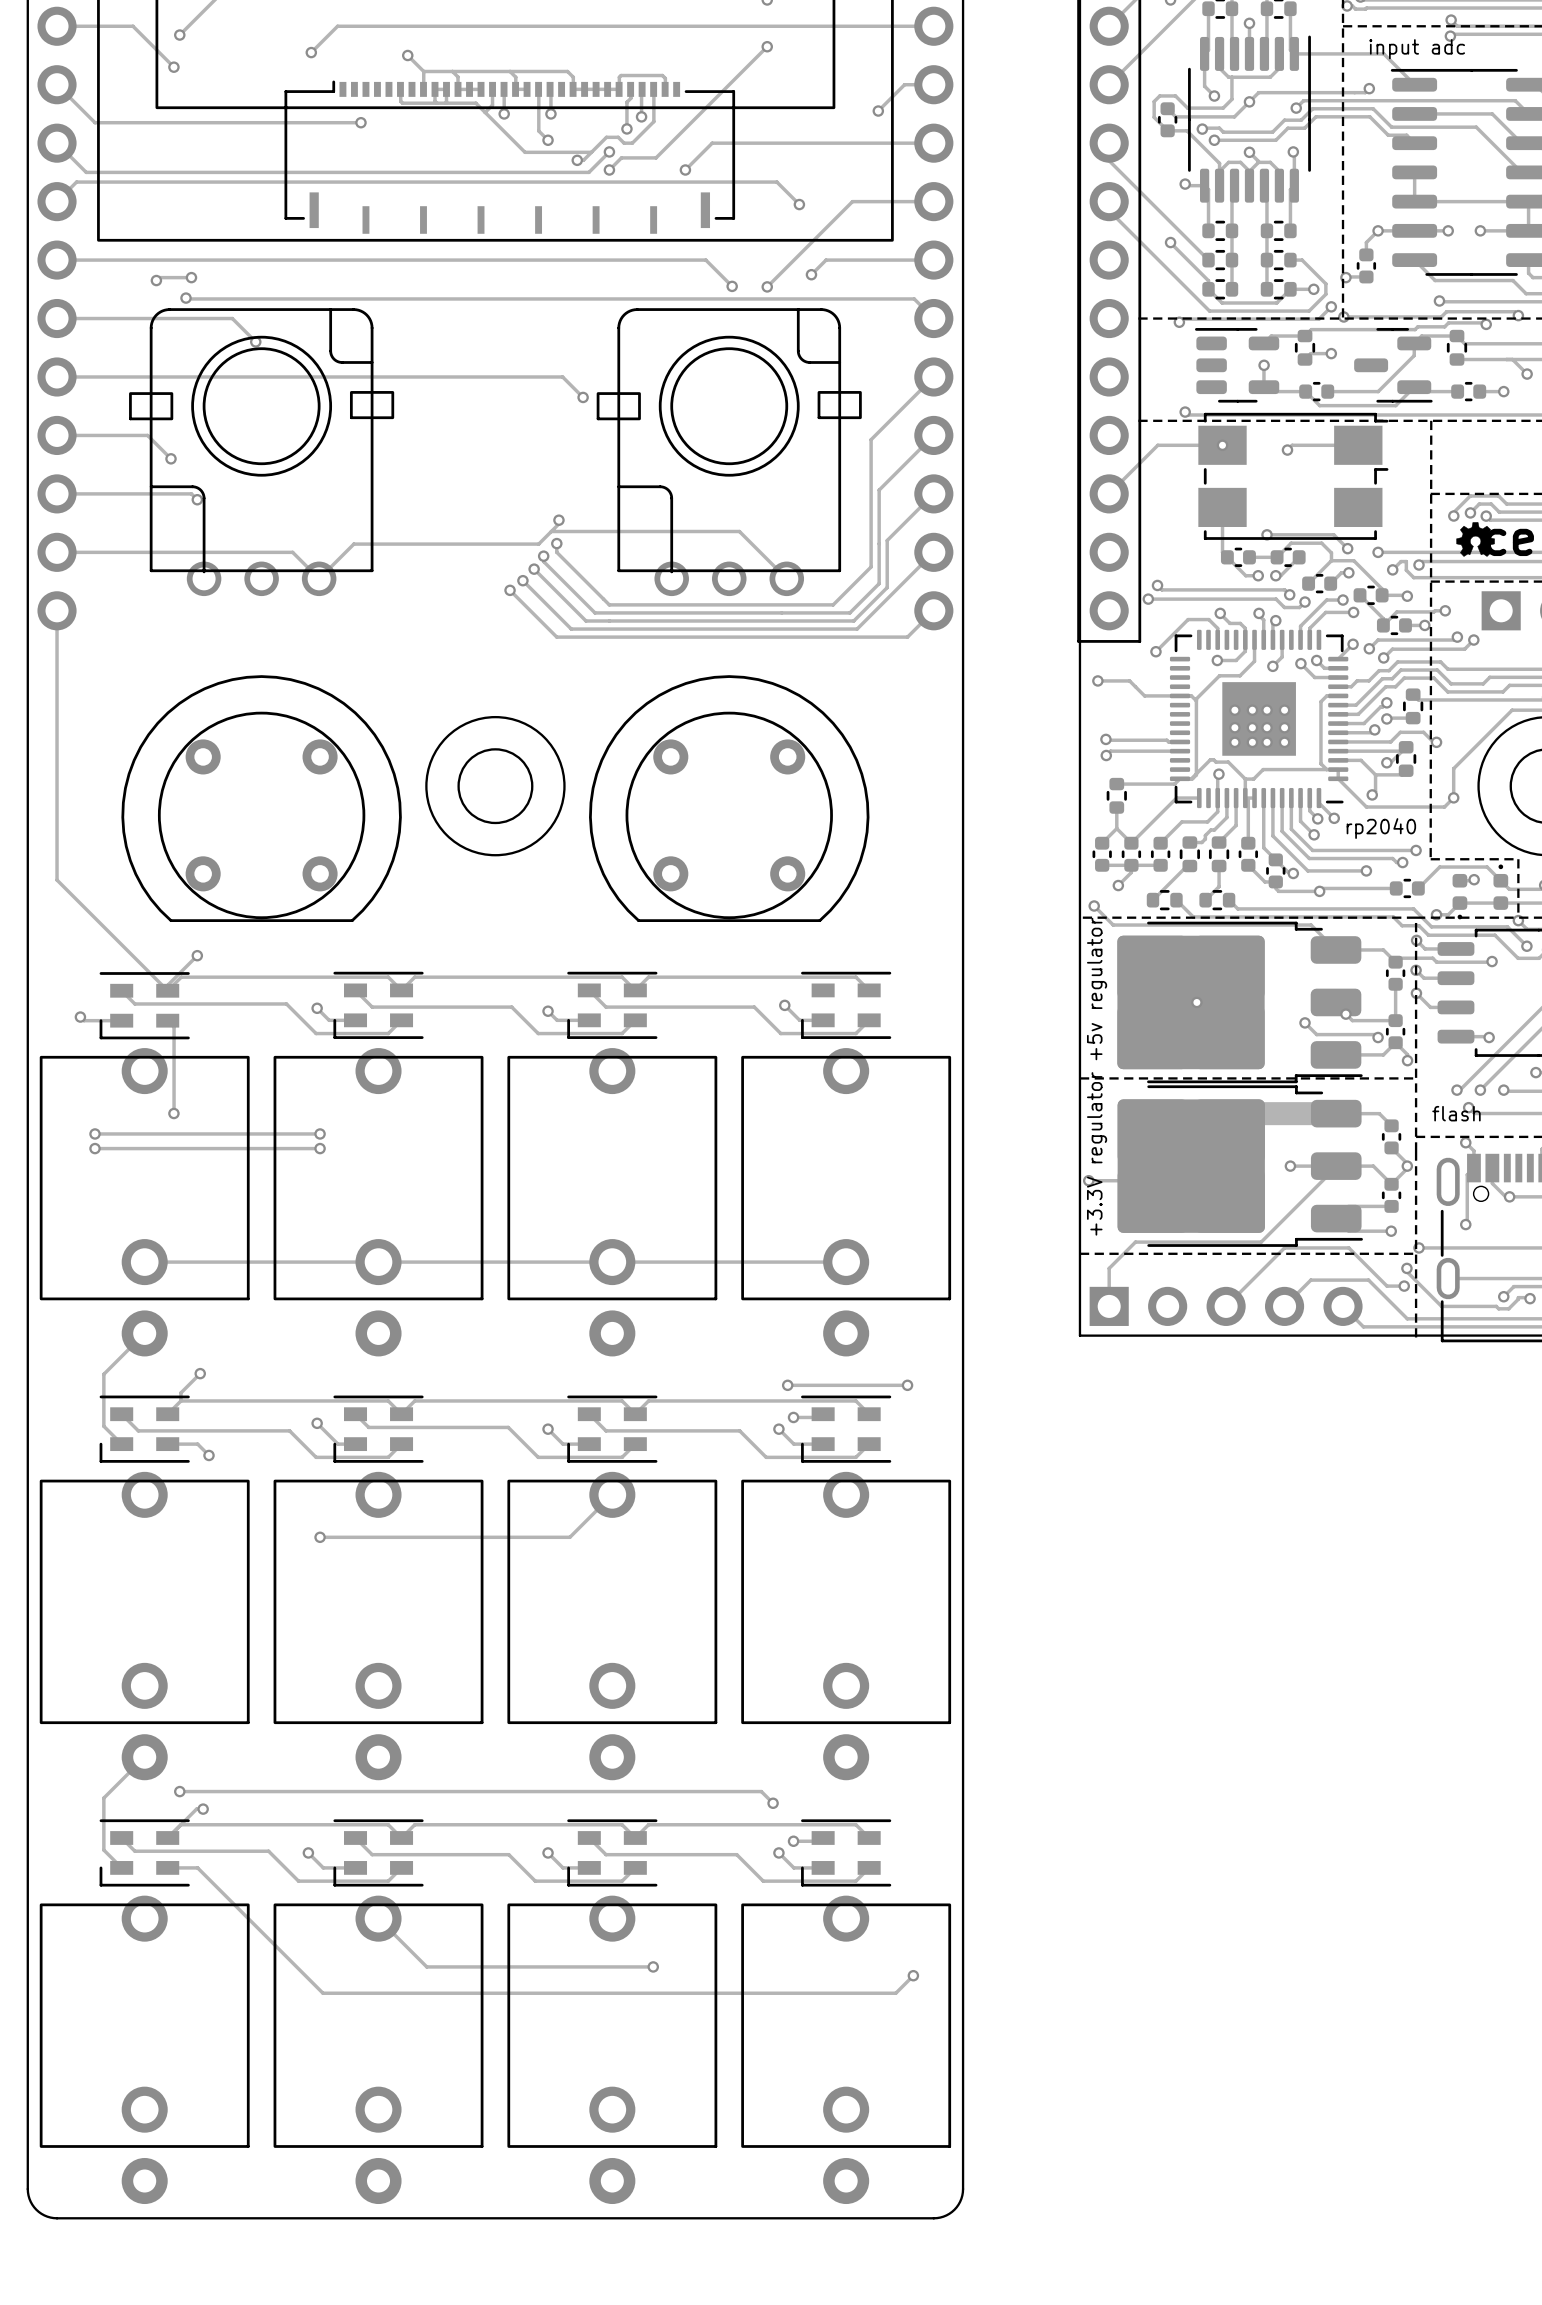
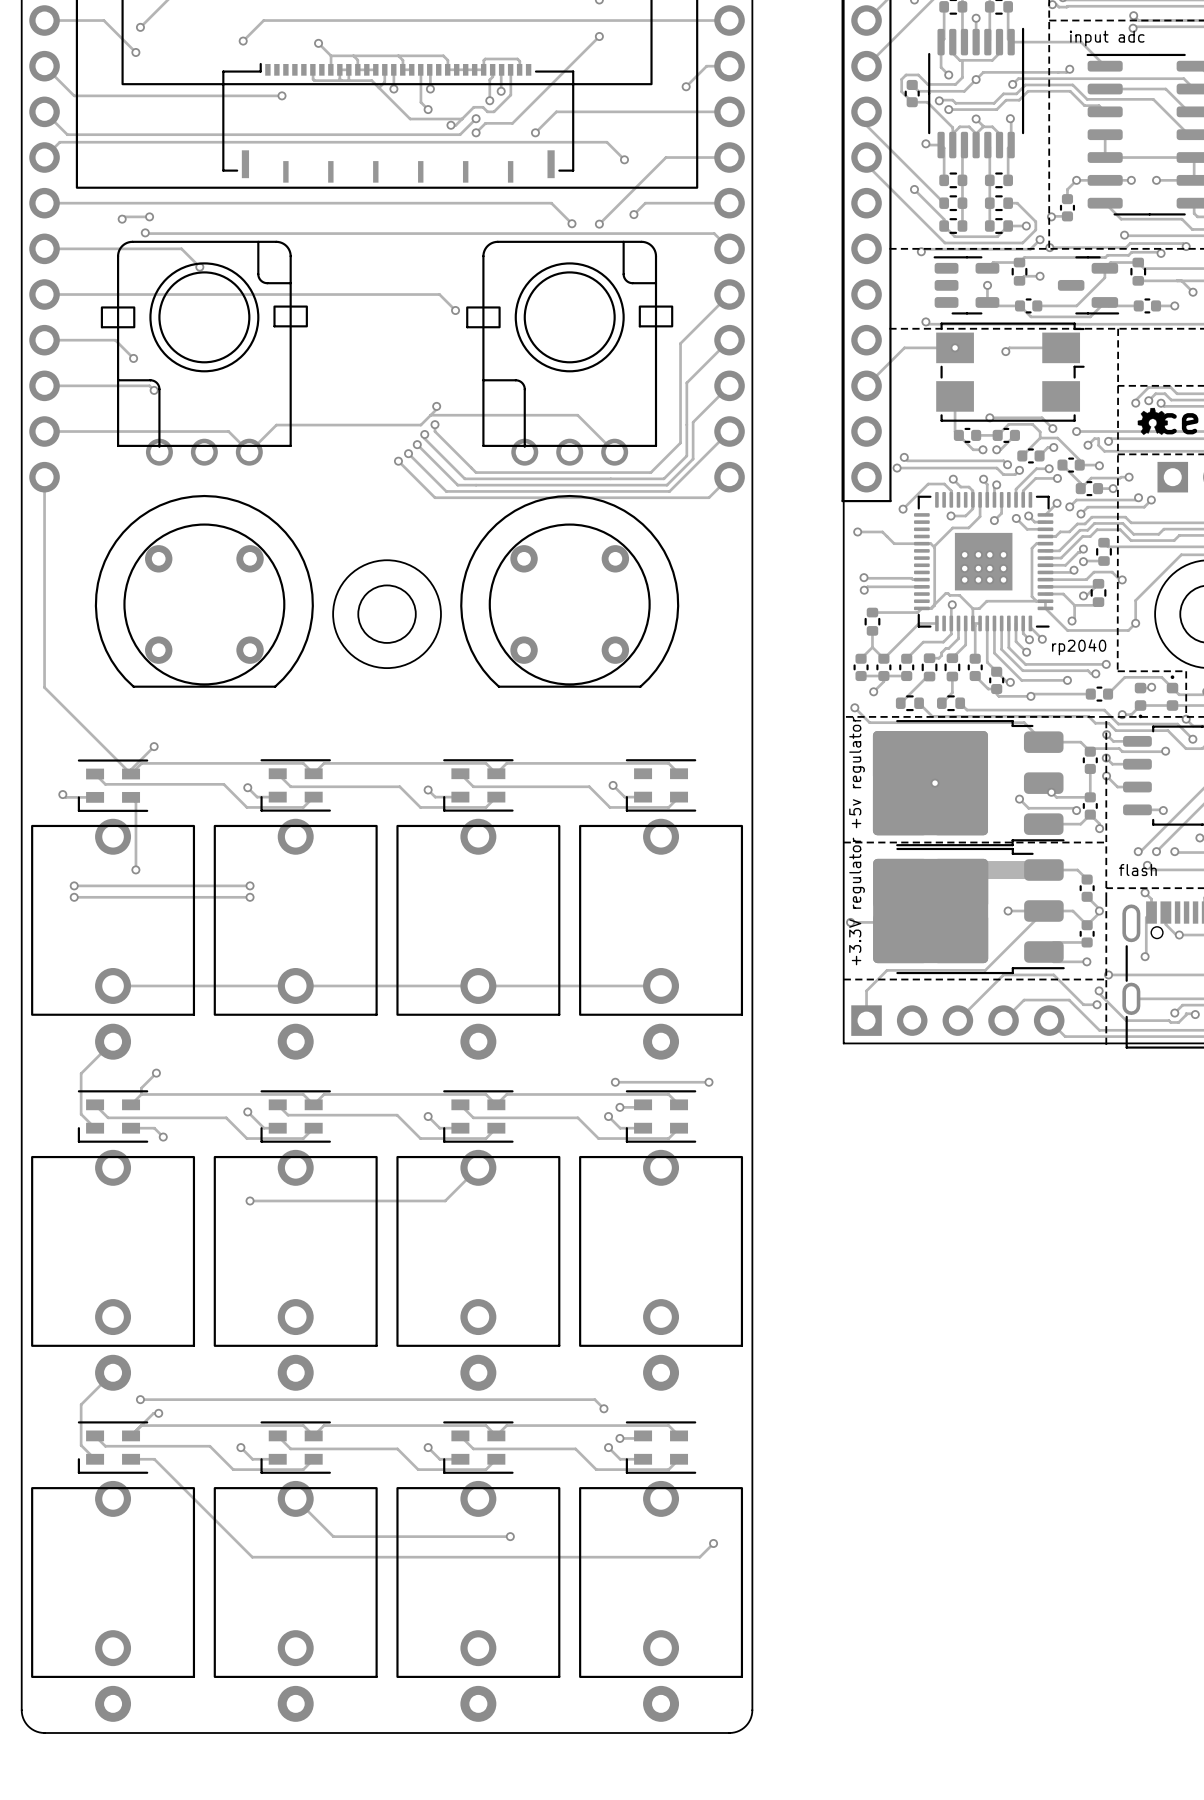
part position: (261, 798) -> (204, 591)
part position: (729, 798) -> (569, 591)

